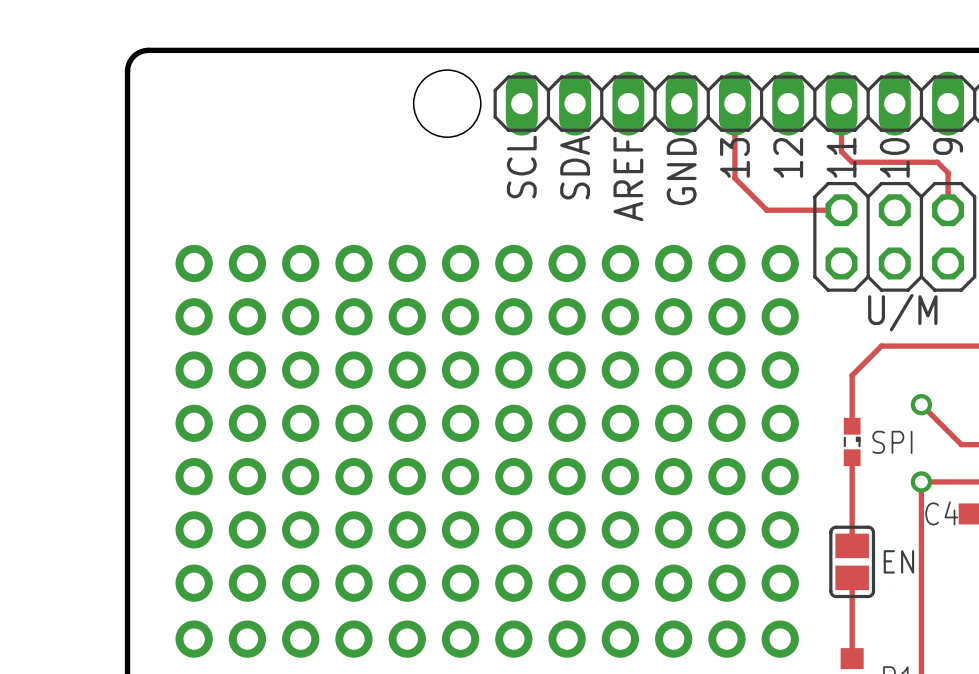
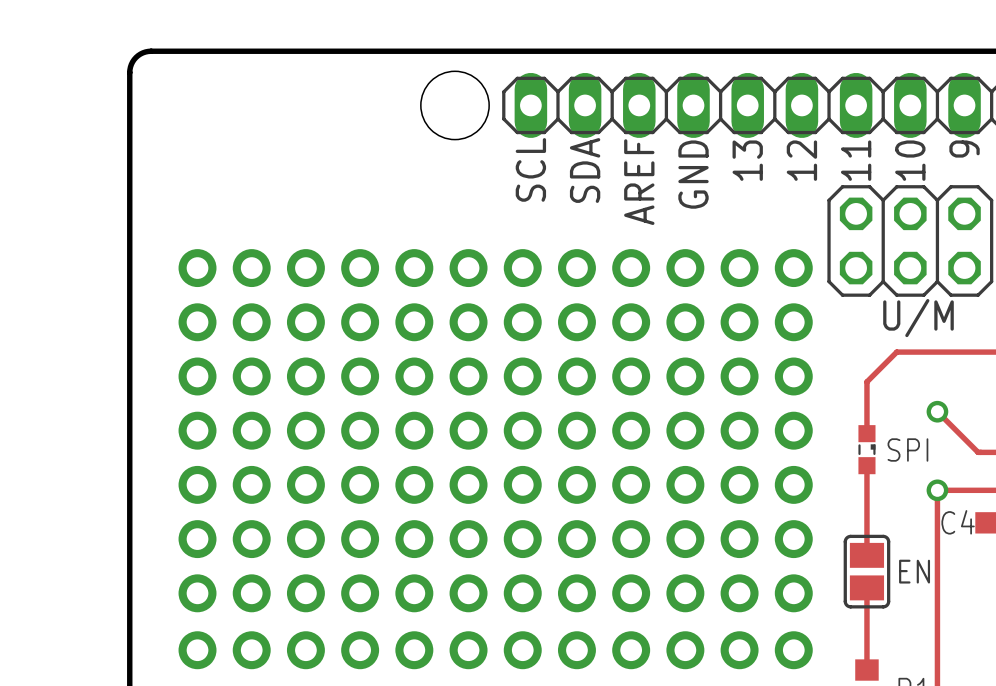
track: (734, 103) (734, 178) (766, 210) (841, 210) -> none
track: (841, 103) (841, 151) (852, 162) (937, 162) (948, 172) (948, 210) -> none

